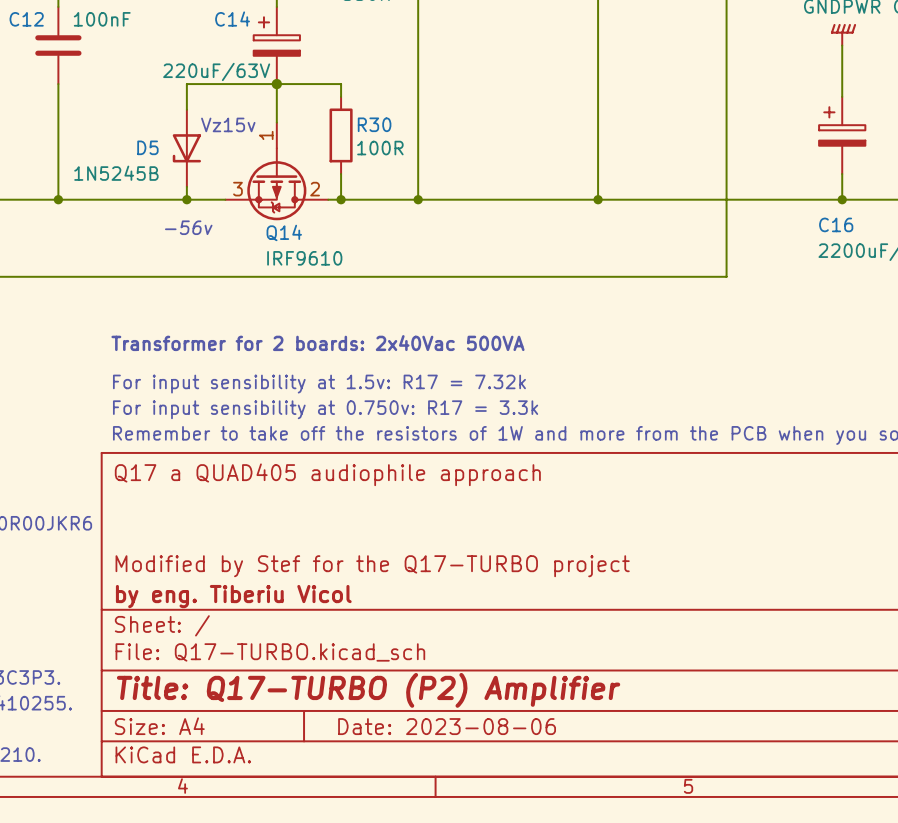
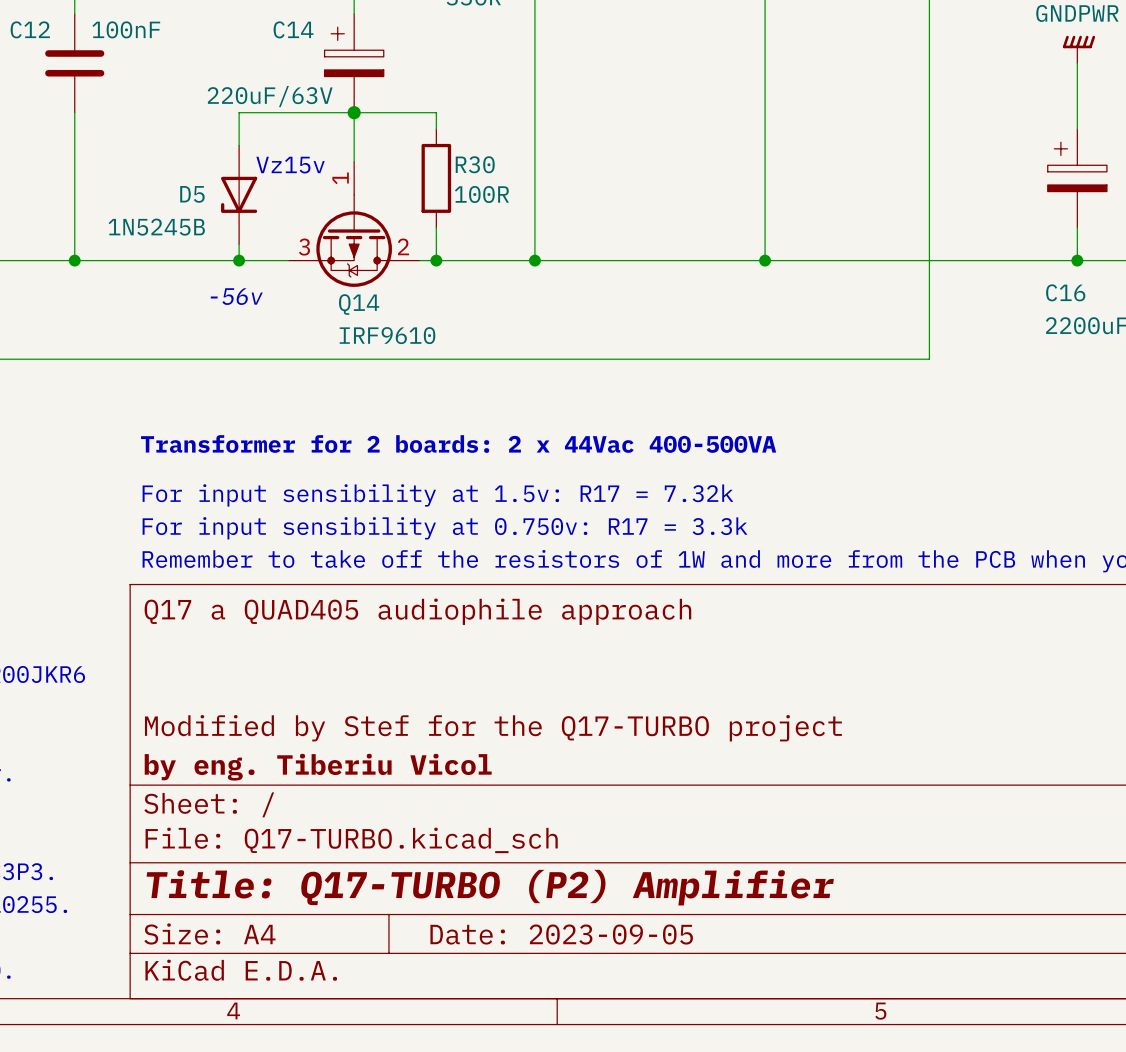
text: Transformer for 2 boards: 2x40Vac 500VA (317, 343) -> Transformer for 2 boards: 2 x 44Vac 400-500VA (458, 444)
title block: Date: 2023-08-06 (447, 726) -> Date: 2023-09-05 (561, 934)

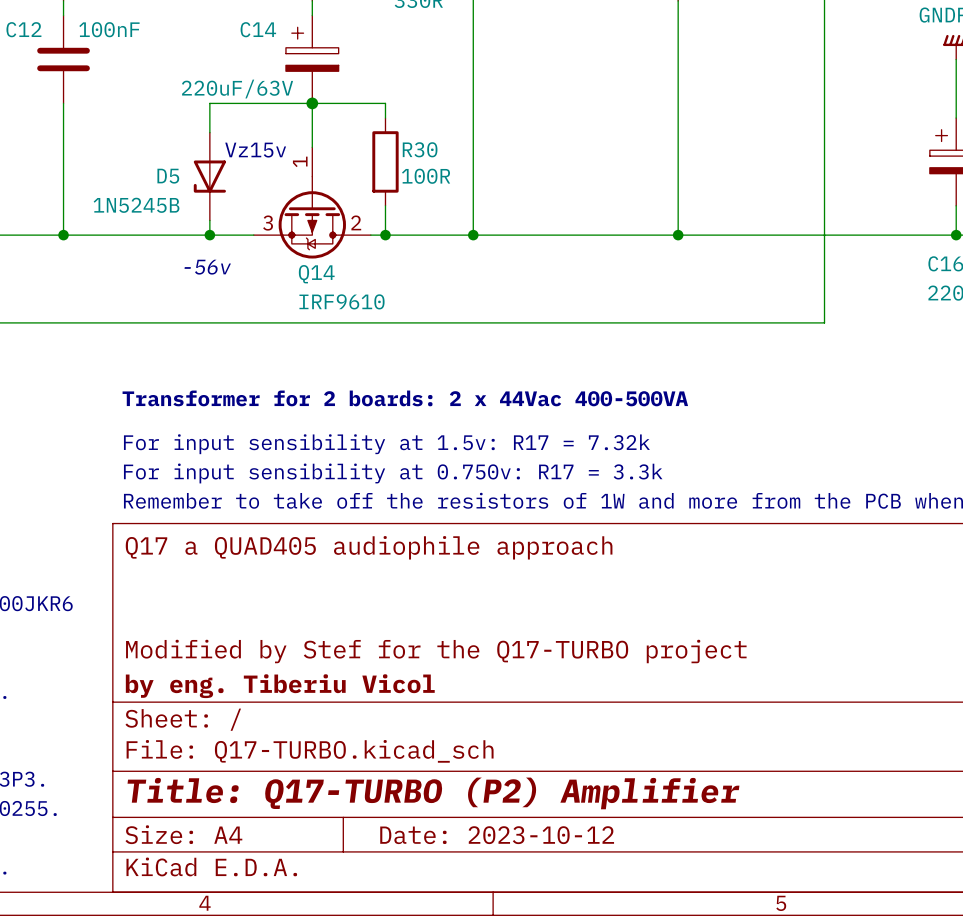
title block: Date: 2023-09-05 (561, 934) -> Date: 2023-10-12 (497, 835)

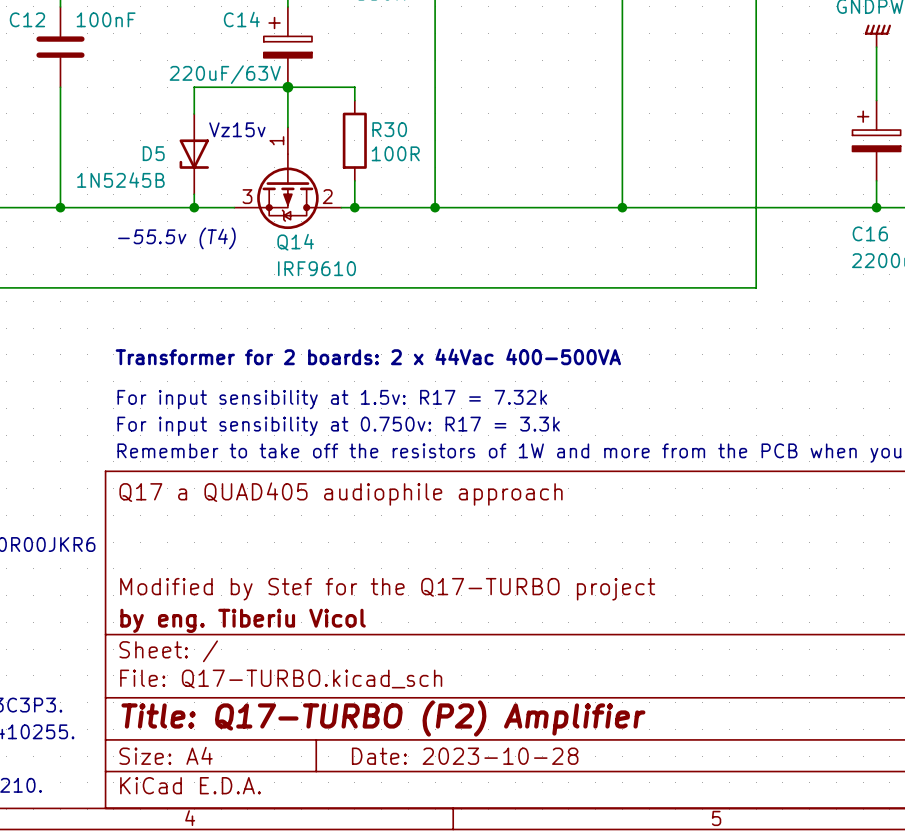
text: none -> -55.5v (T4) (176, 238)
text: -56v (207, 267) -> none
title block: Date: 2023-10-12 (497, 835) -> Date: 2023-10-28 (465, 756)

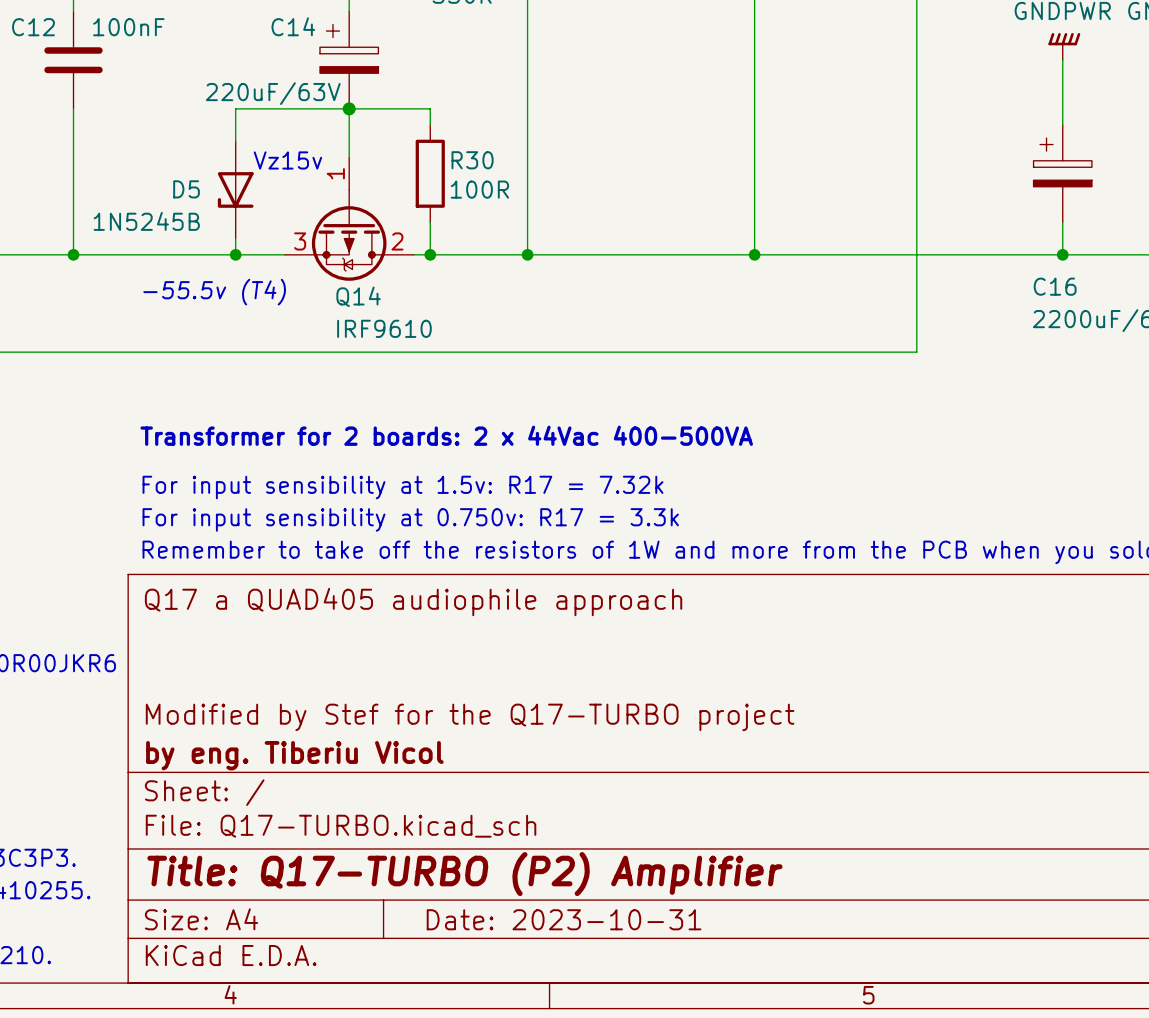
title block: Date: 2023-10-28 (465, 756) -> Date: 2023-10-31 (564, 919)

